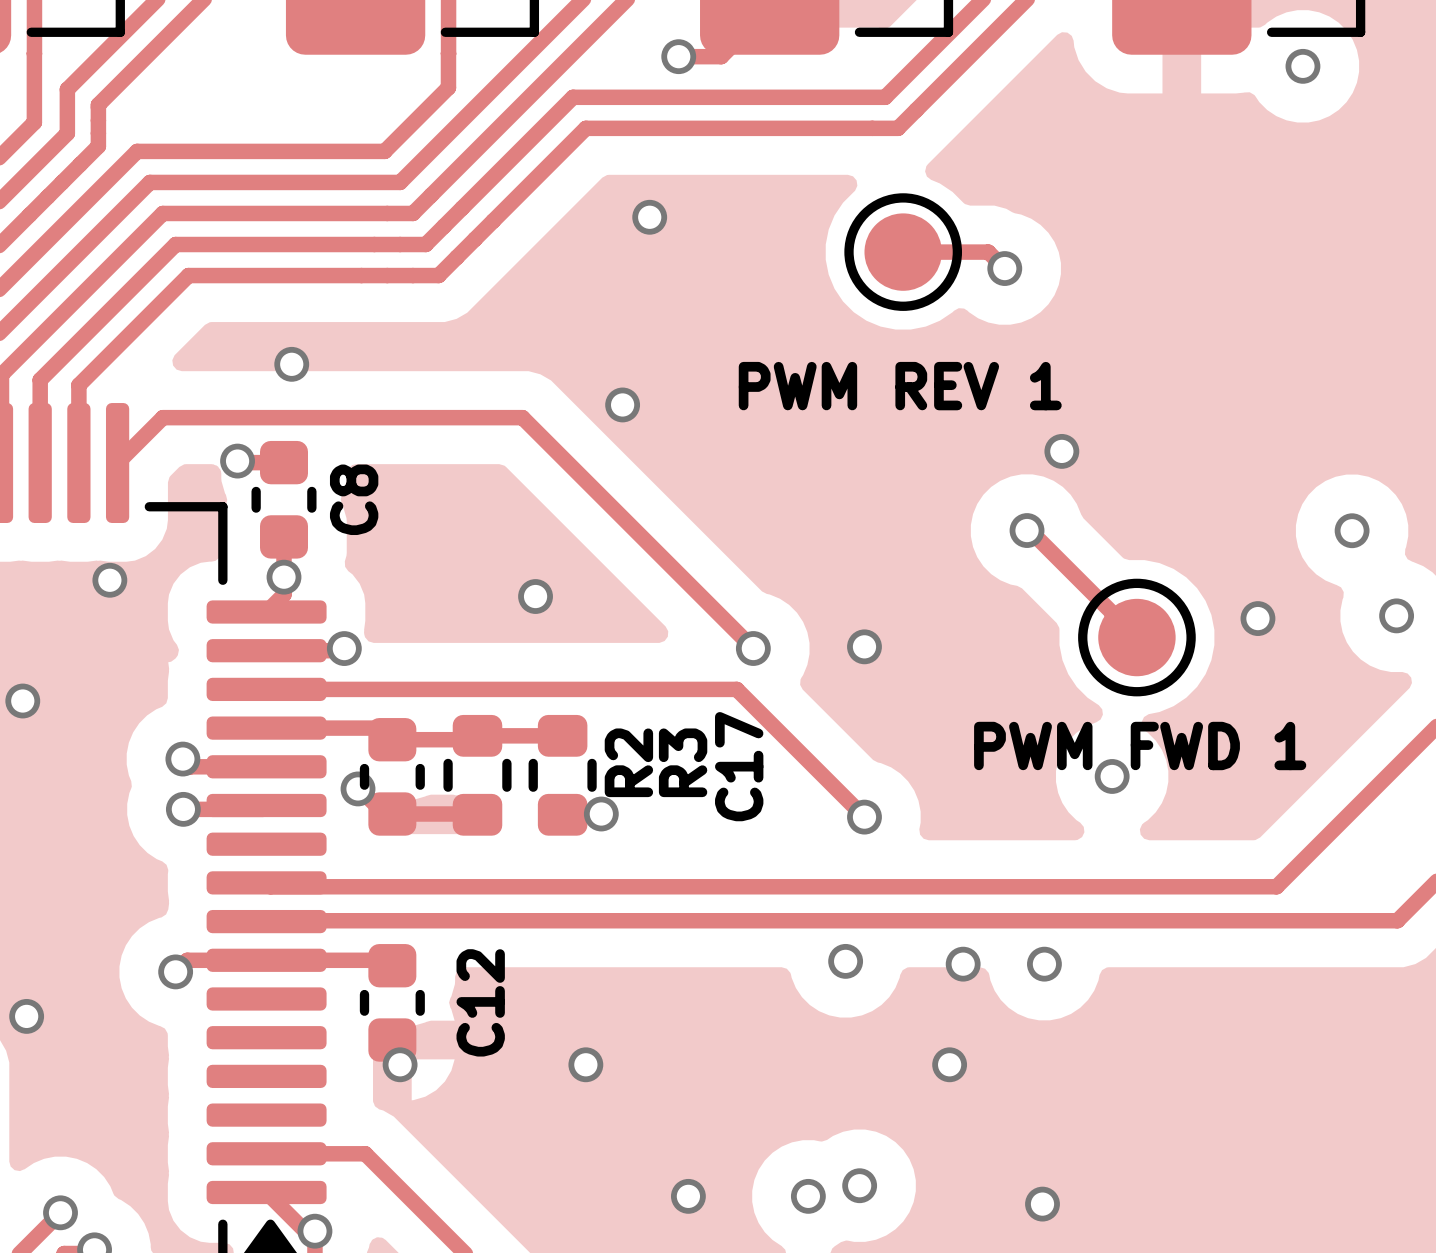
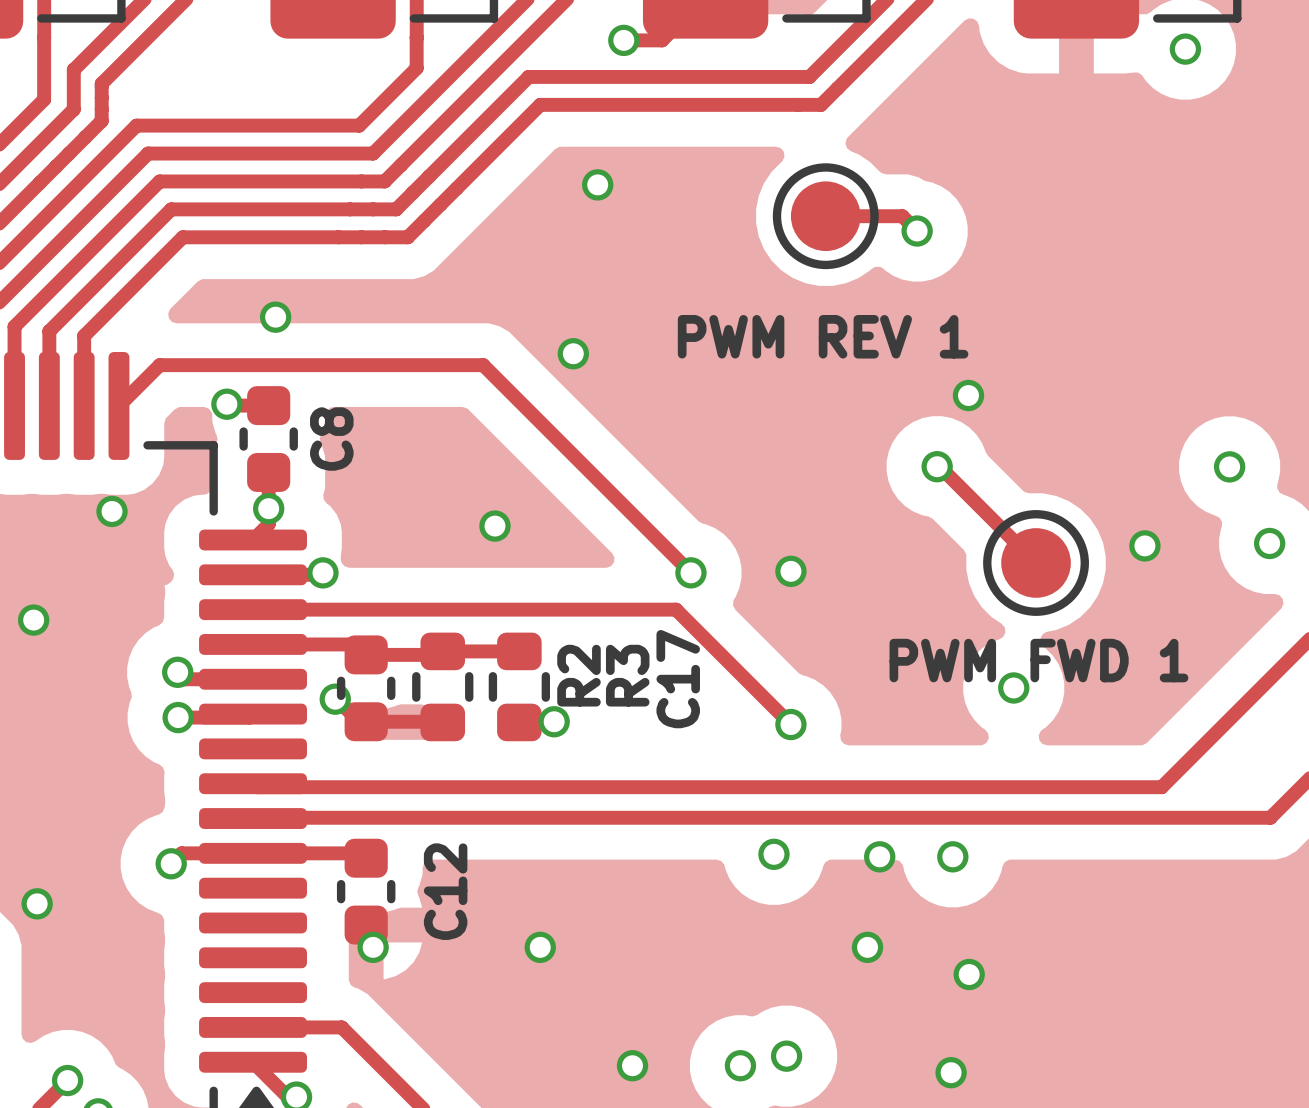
via: none -> (969, 974)

